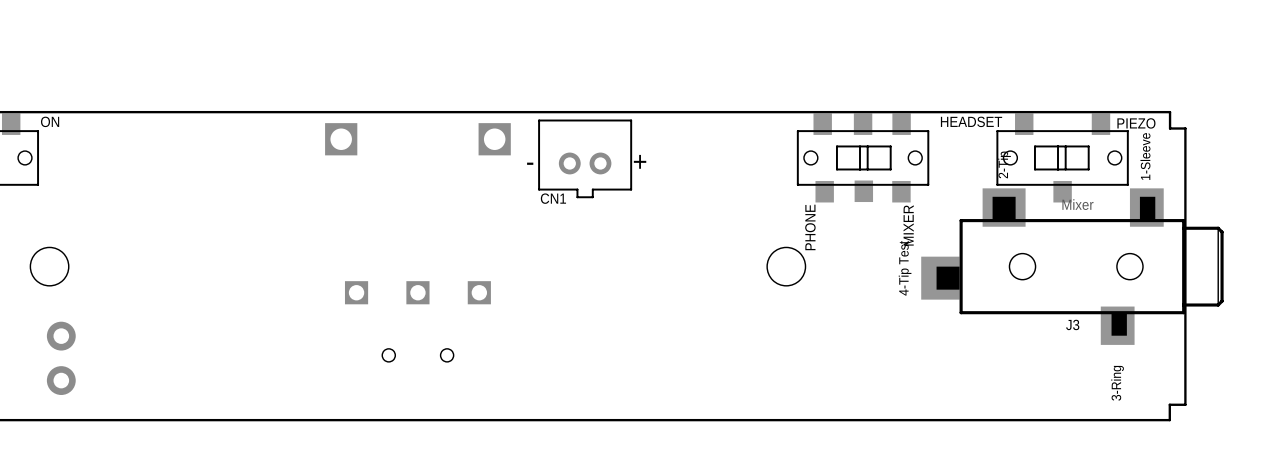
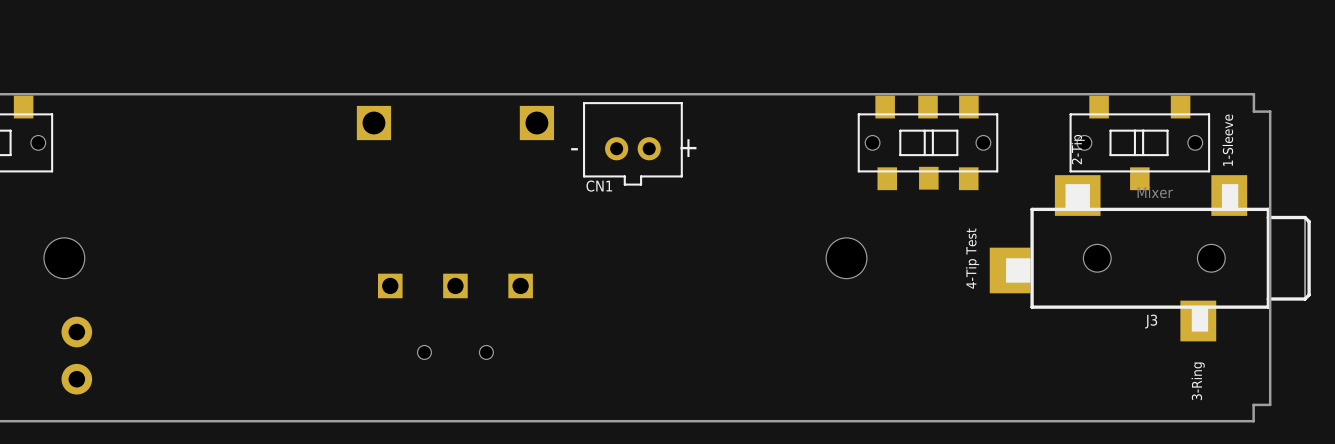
text: ON (50, 121) -> none
text: HEADSET (971, 121) -> none
text: PIEZO (1136, 123) -> none
text: MIXER (908, 225) -> none
text: PHONE (810, 227) -> none

